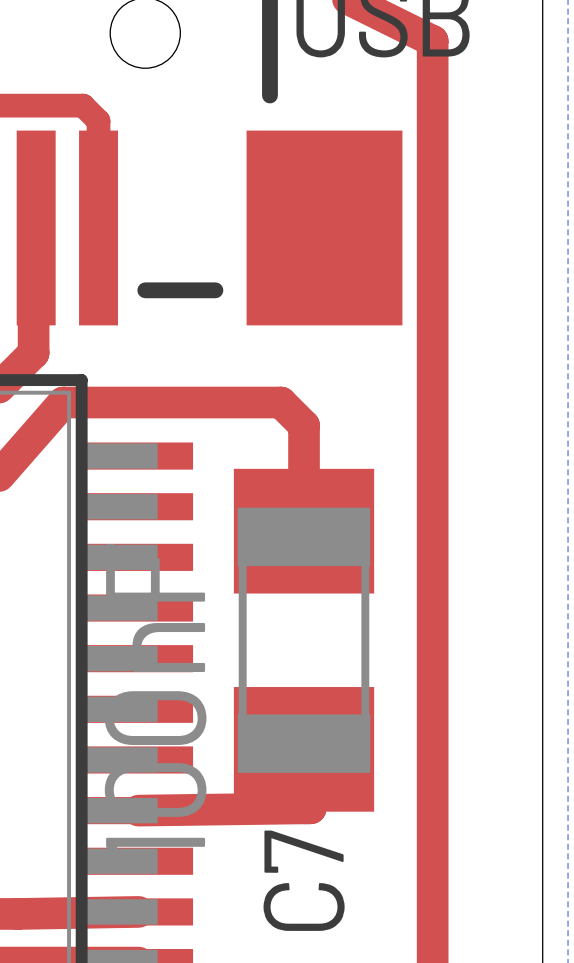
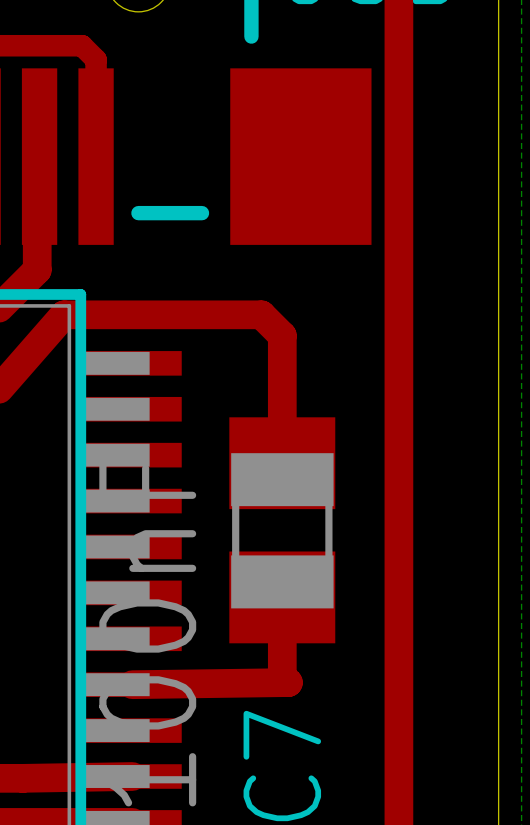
C7 footprint: [233, 468, 375, 812] -> [229, 417, 336, 644]

